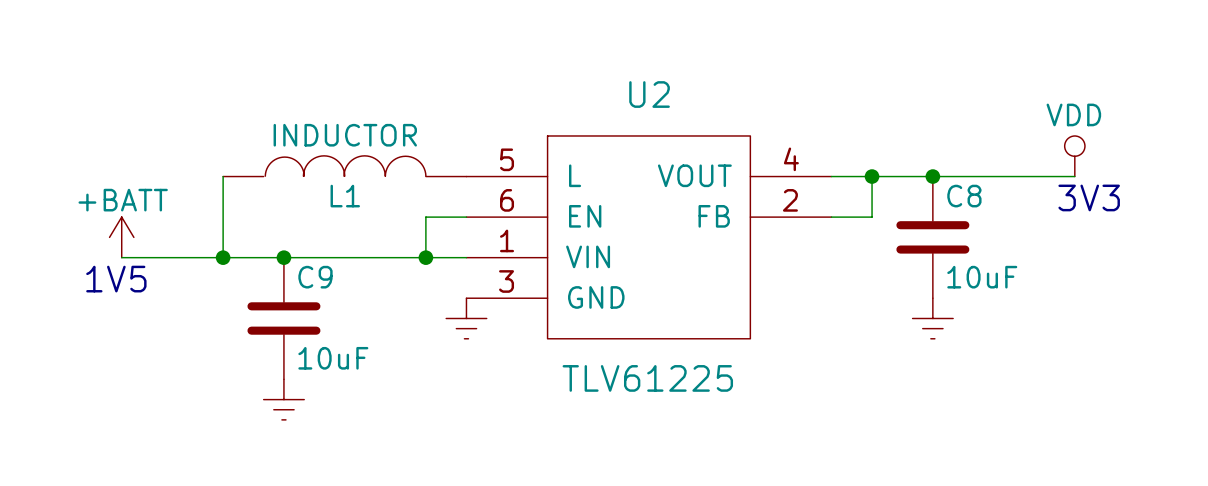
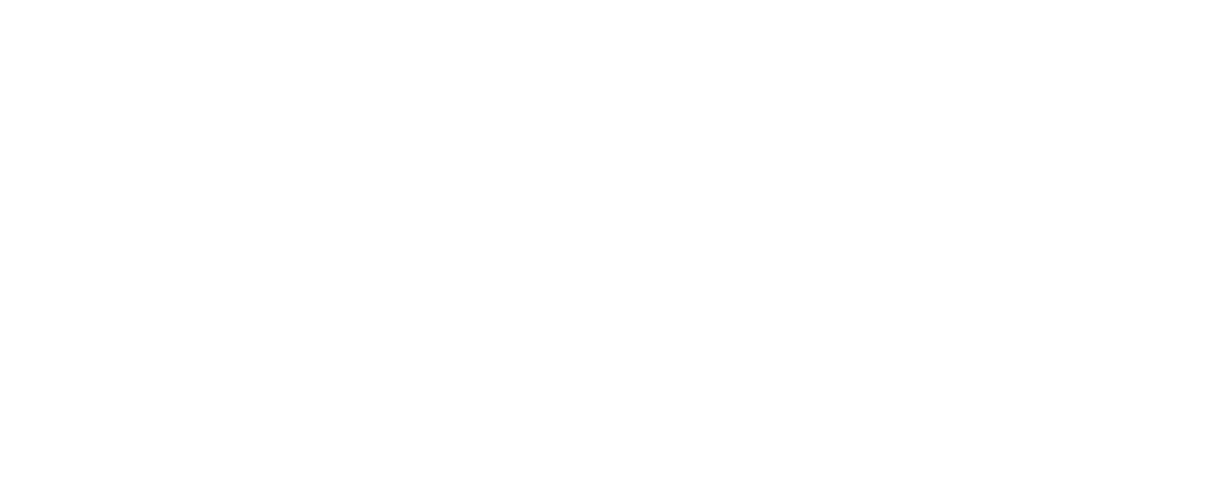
power symbol: VDD (1074, 156) -> none
L1: INDUCTOR (344, 166) -> none
wire: (223, 176) (223, 257) -> none
wire: (831, 176) (1074, 176) -> none
wire: (872, 176) (872, 217) (831, 217) -> none
junction: (872, 176) -> none
junction: (932, 176) -> none
text: 3V3 (1089, 197) -> none
wire: (466, 217) (425, 217) (425, 257) -> none
power symbol: +BATT (121, 237) -> none
U2: TLV61225 (648, 237) -> none
C8: 10uF (932, 237) -> none
wire: (121, 257) (466, 257) -> none
junction: (223, 257) -> none
junction: (283, 257) -> none
junction: (425, 257) -> none
text: 1V5 (116, 279) -> none
C9: 10uF (283, 318) -> none
power symbol: (466, 318) -> none
power symbol: (932, 318) -> none
power symbol: (283, 399) -> none

